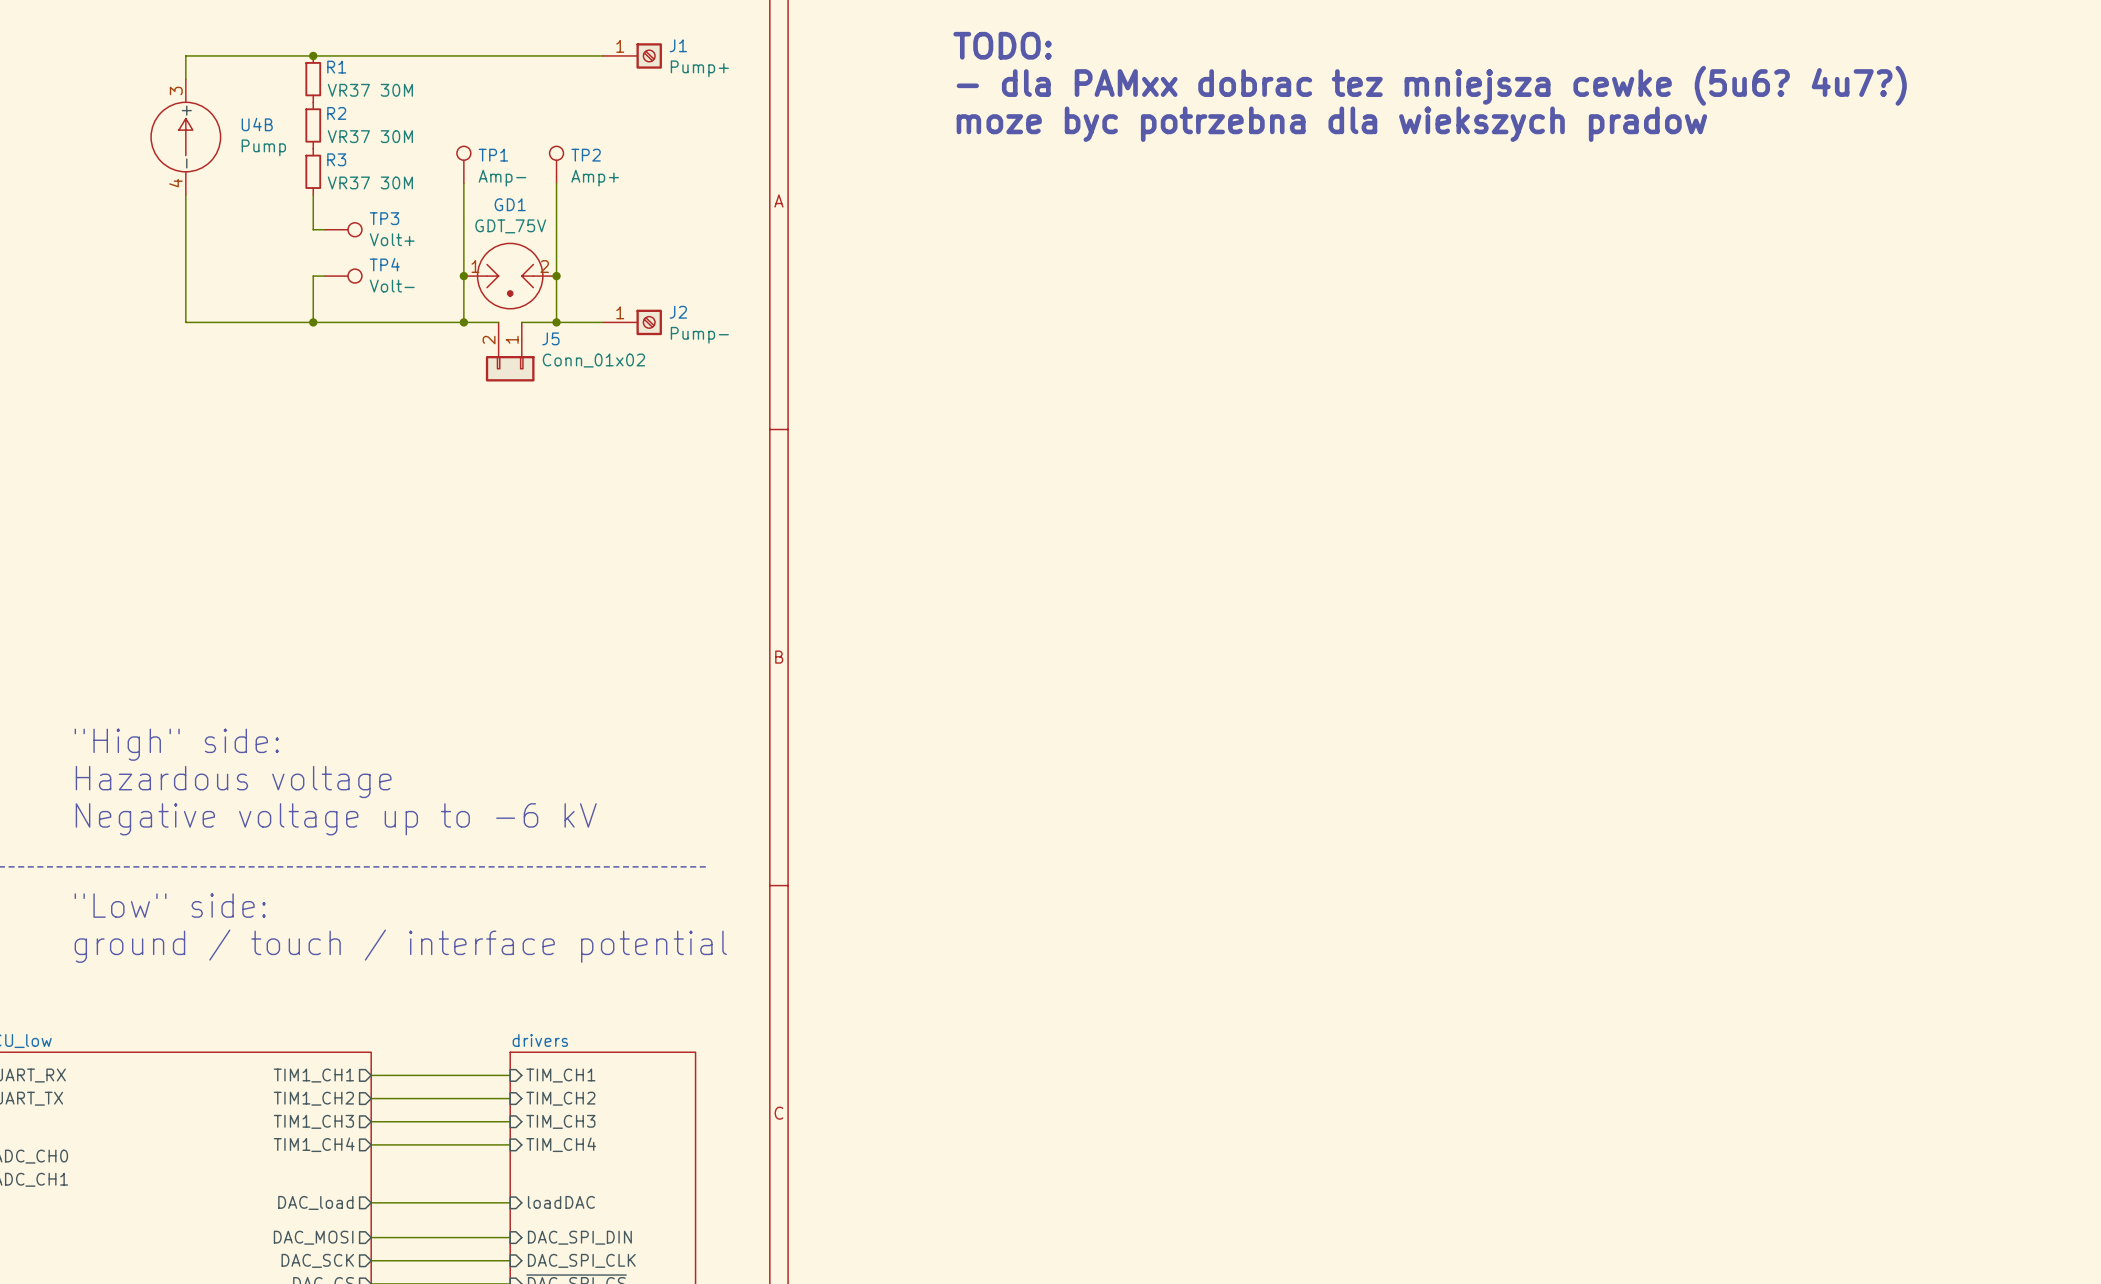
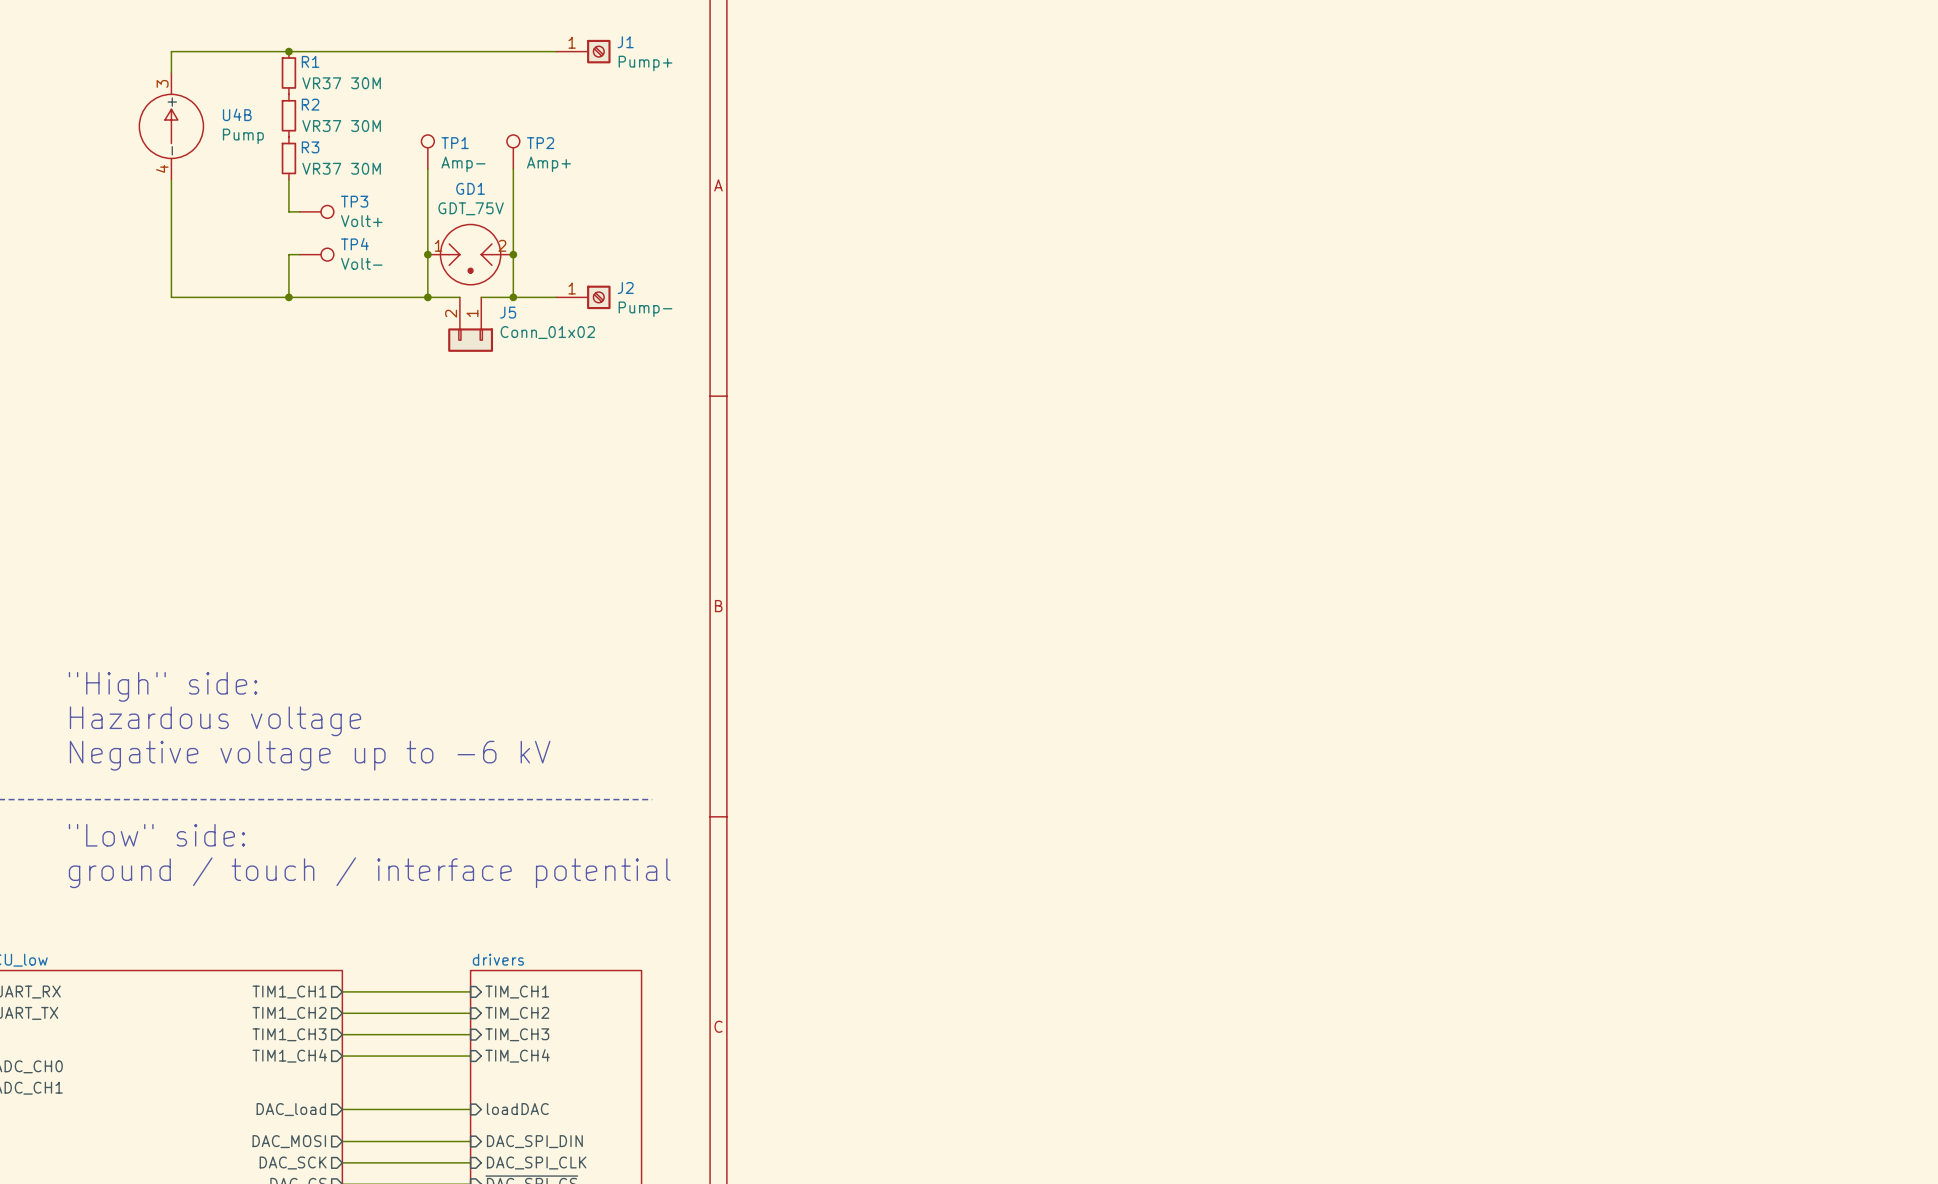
text: TODO: (1002, 45) -> none
text: - dla PAMxx dobrac tez mniejsza cewke (5u6? 4u7?) (1431, 85) -> none
text: moze byc potrzebna dla wiekszych pradow (1331, 124) -> none

